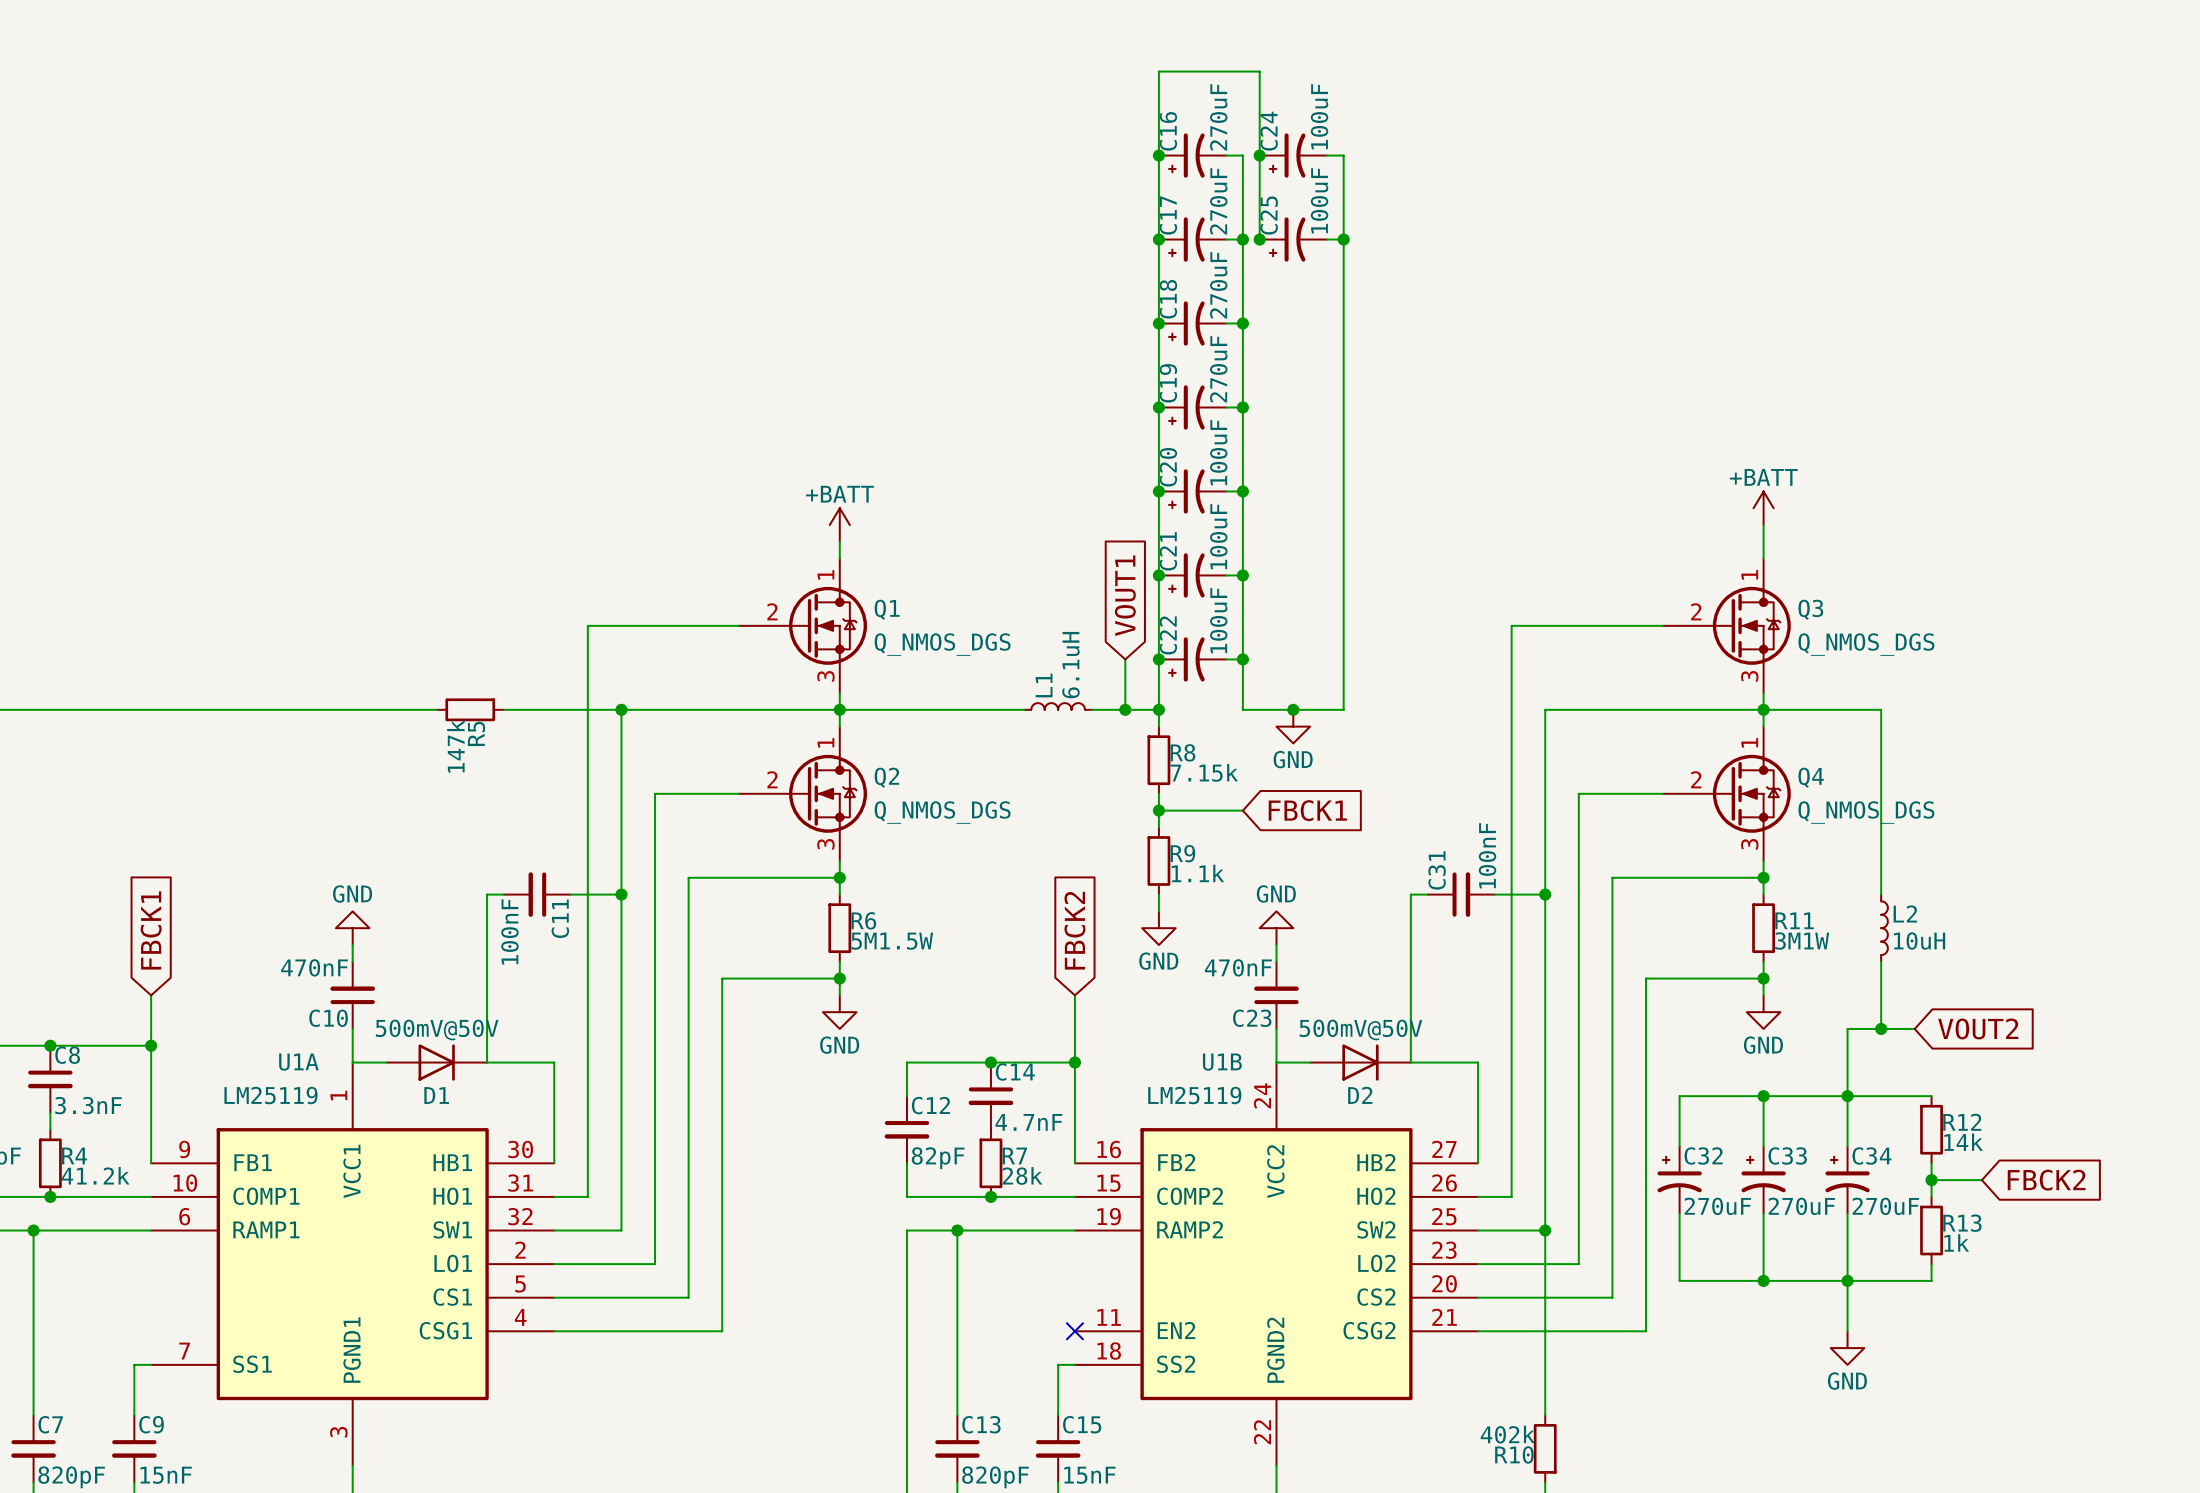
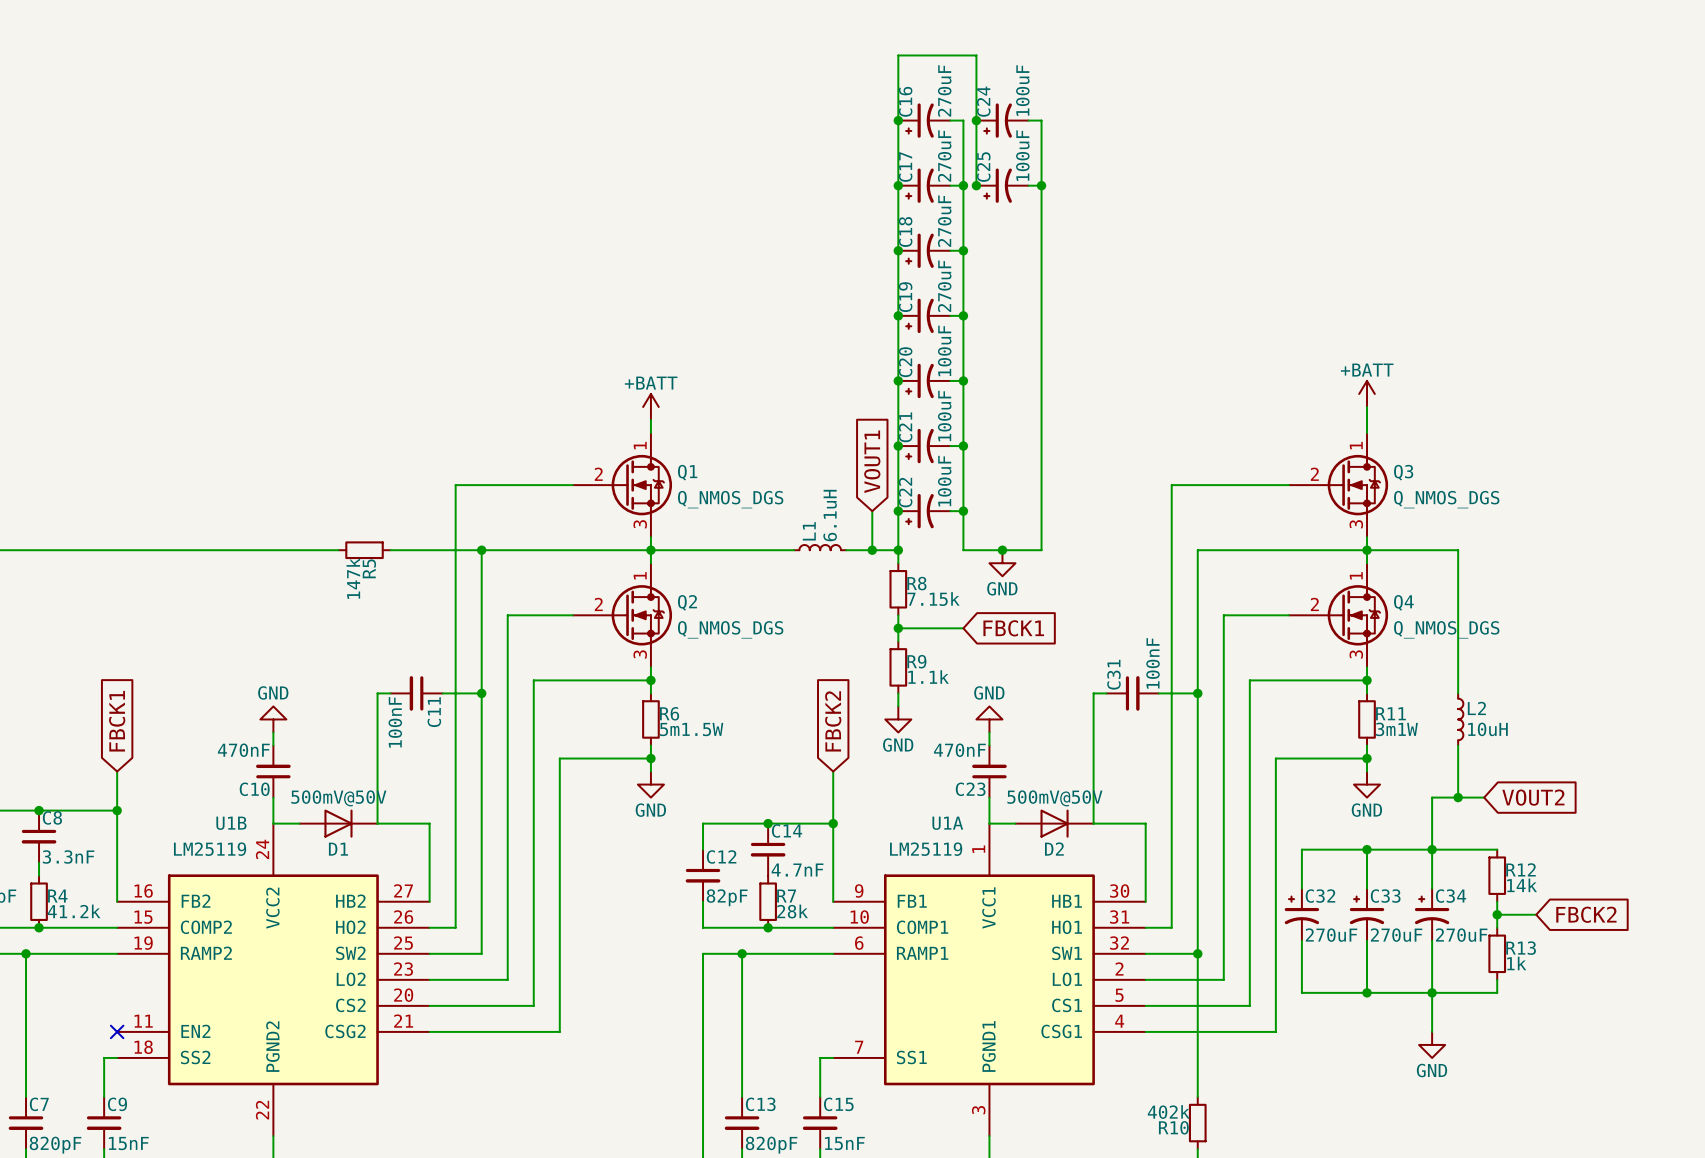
R6 value: 5M1.5W (892, 941) -> 5m1.5W (691, 729)
R11 value: 3M1W (1802, 941) -> 3m1W (1396, 729)
U1A position: (352, 1264) -> (989, 979)
U1B position: (1276, 1264) -> (273, 979)
no-connect mark: none -> (117, 1031)
no-connect mark: (1074, 1331) -> none

